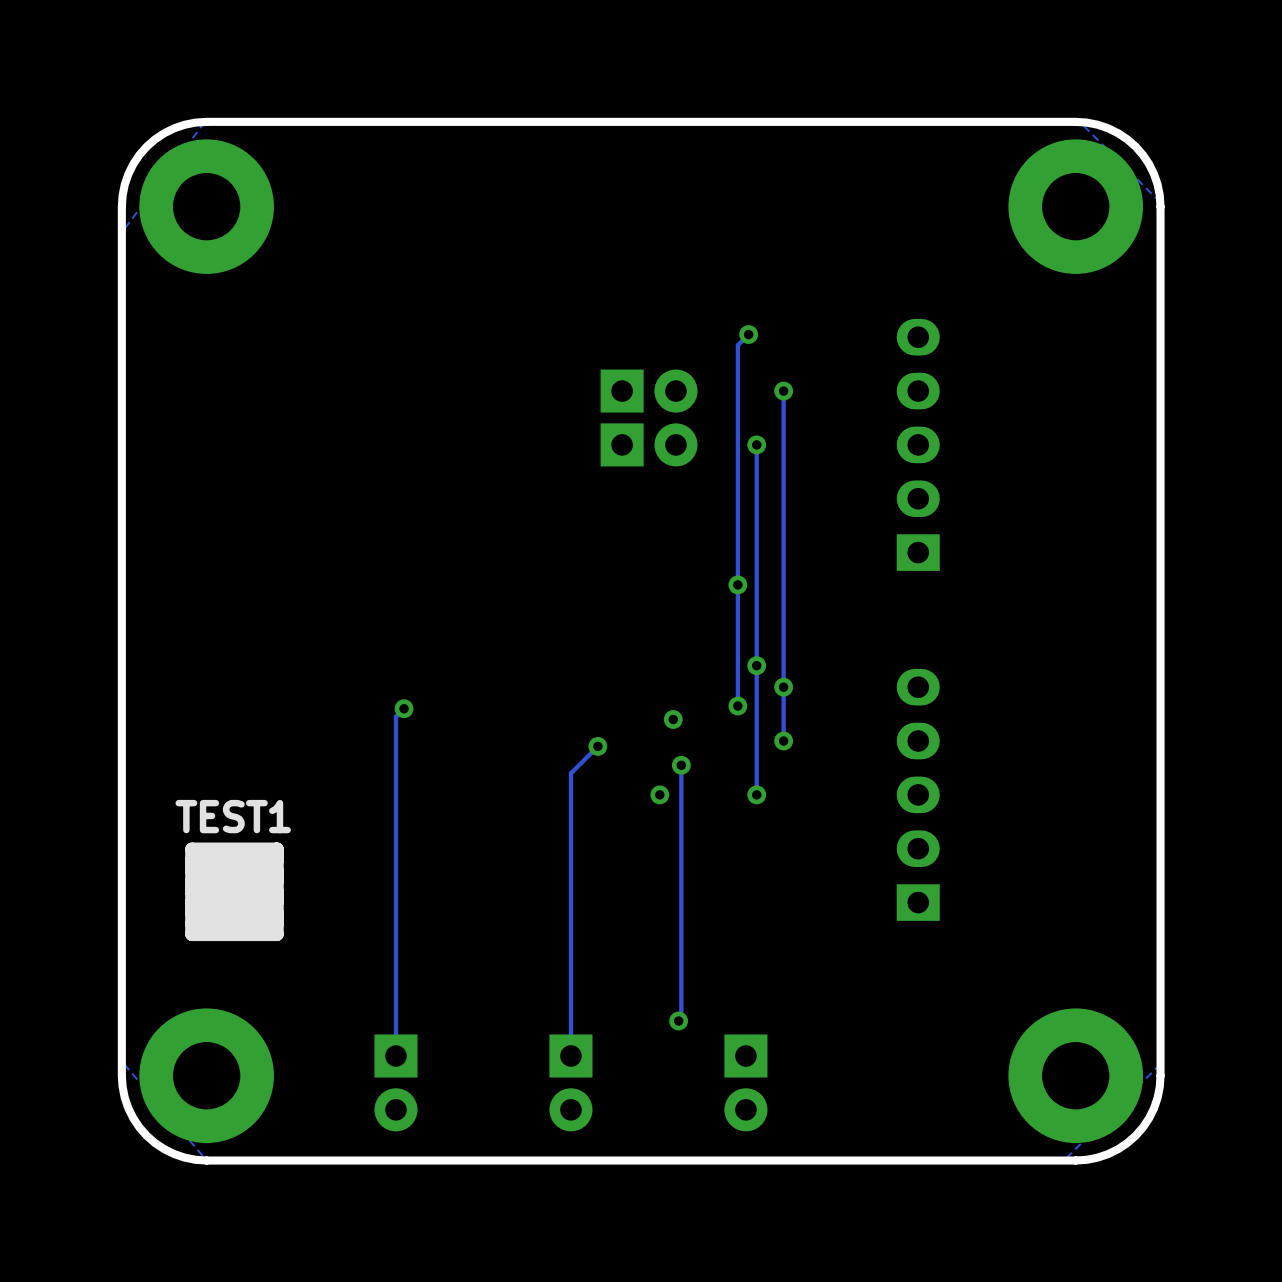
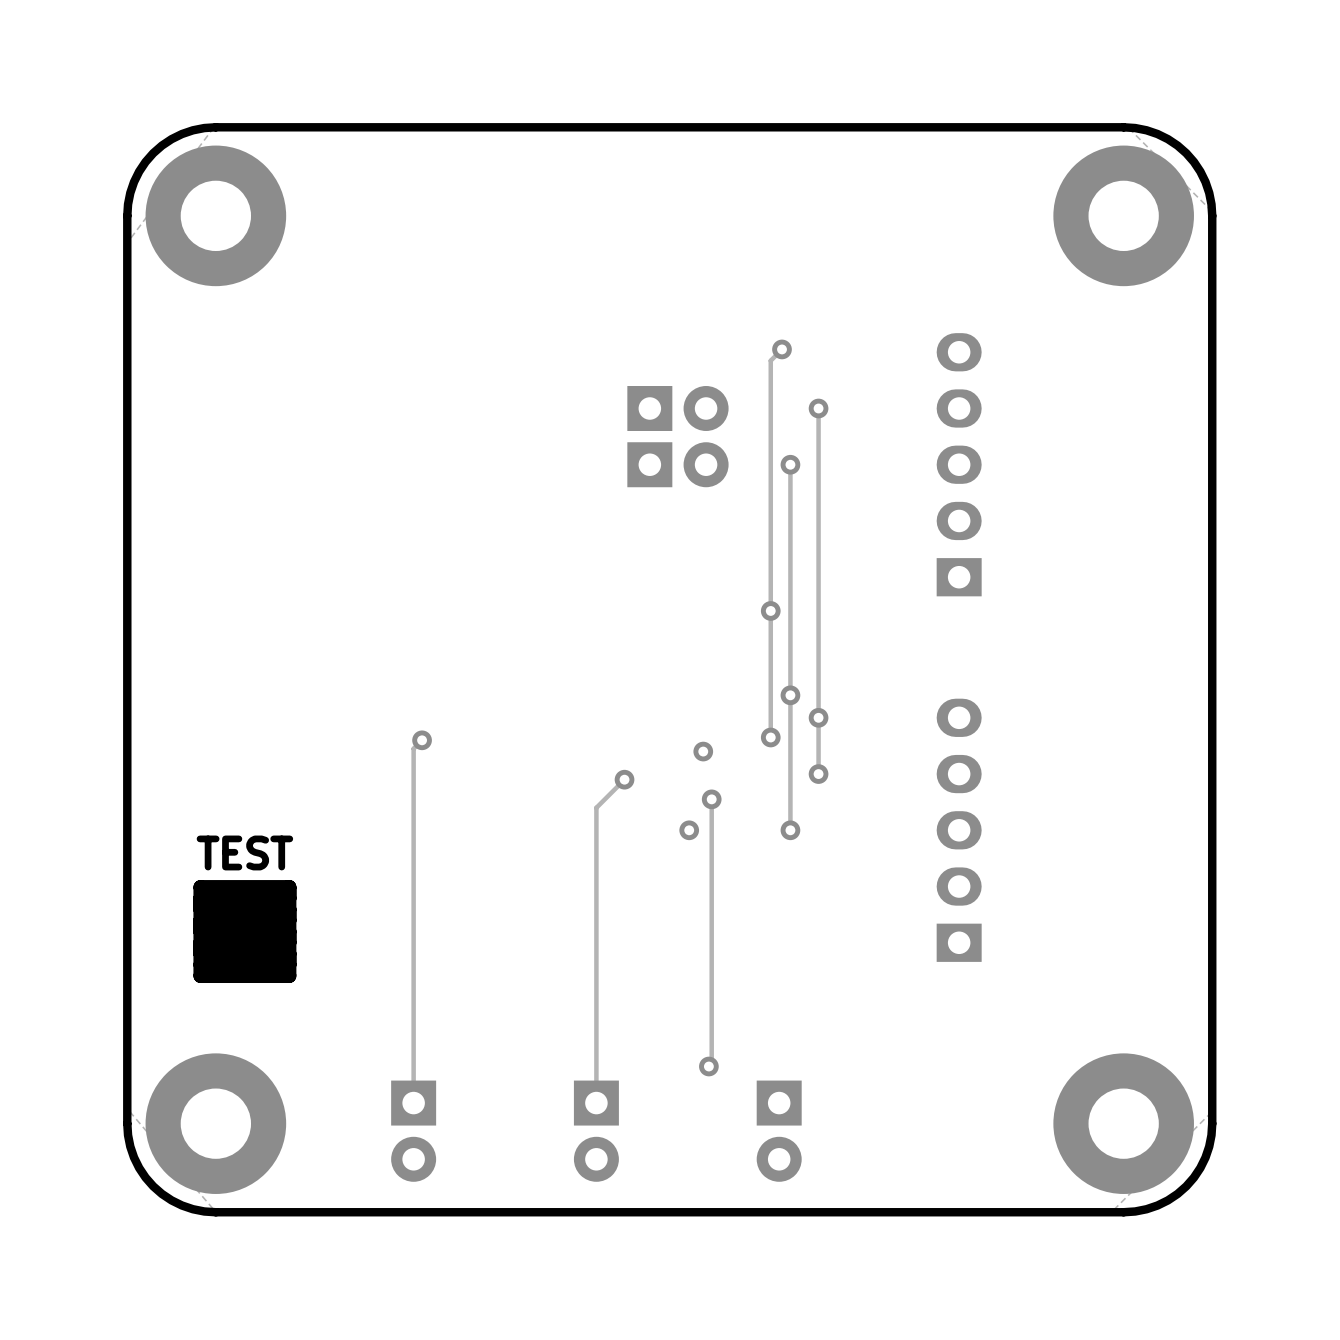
TEST1 name: TEST1 (233, 816) -> TEST (244, 852)

